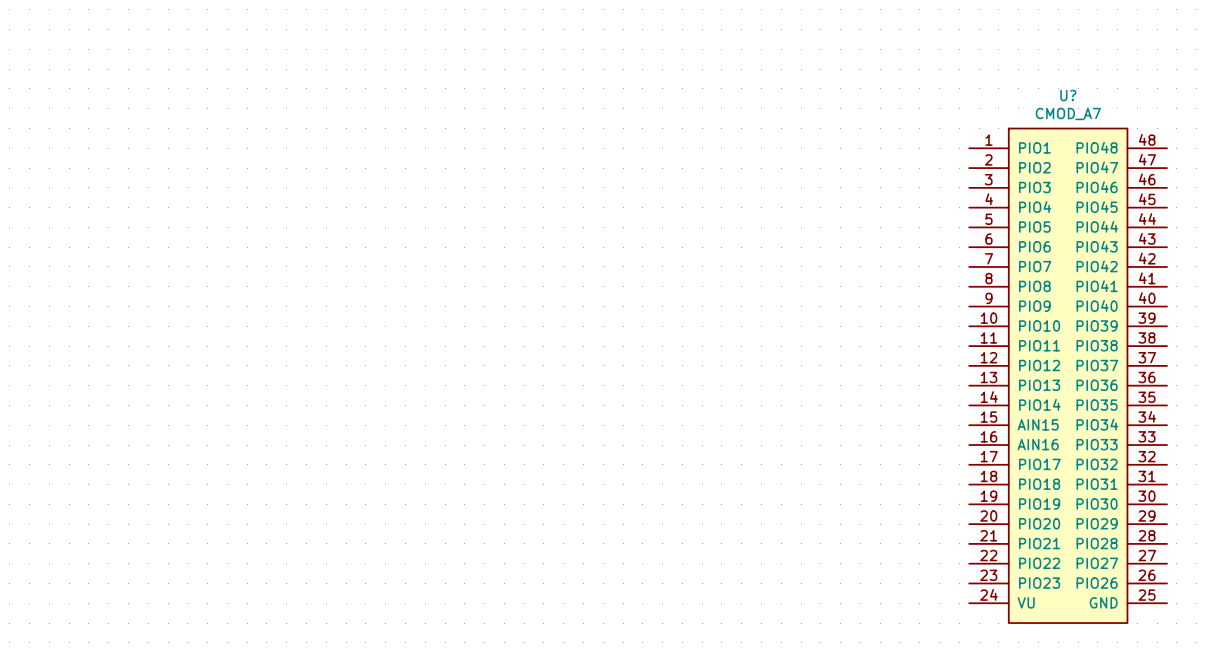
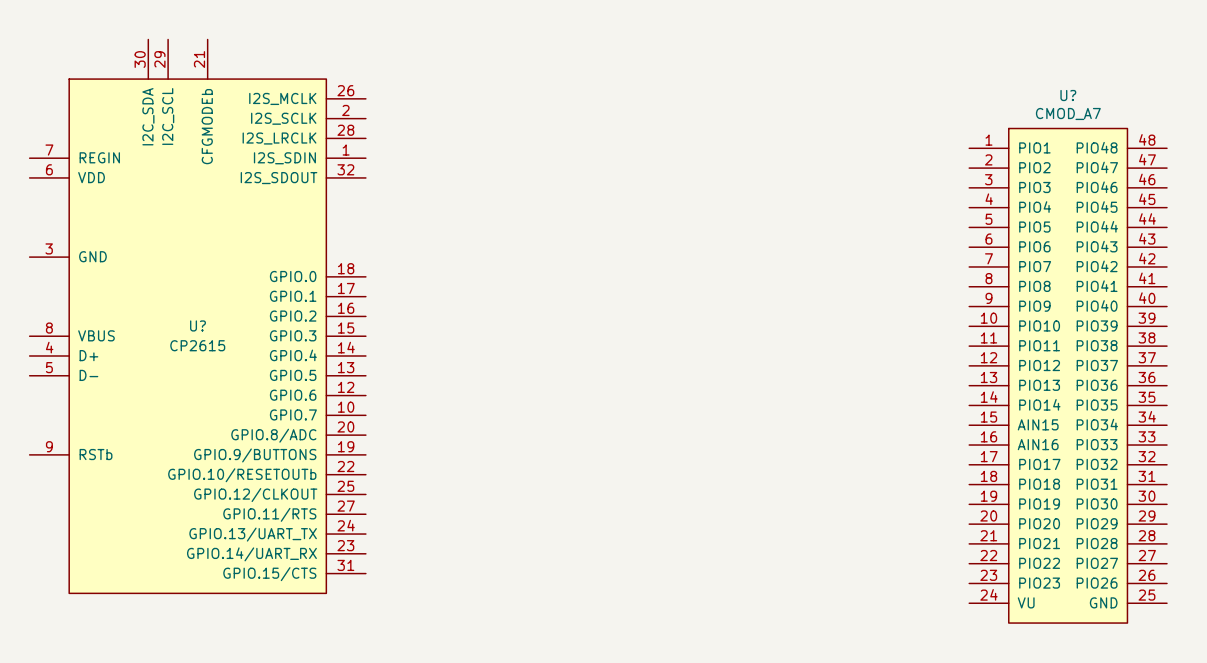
U?: none -> CP2615 (197, 316)

